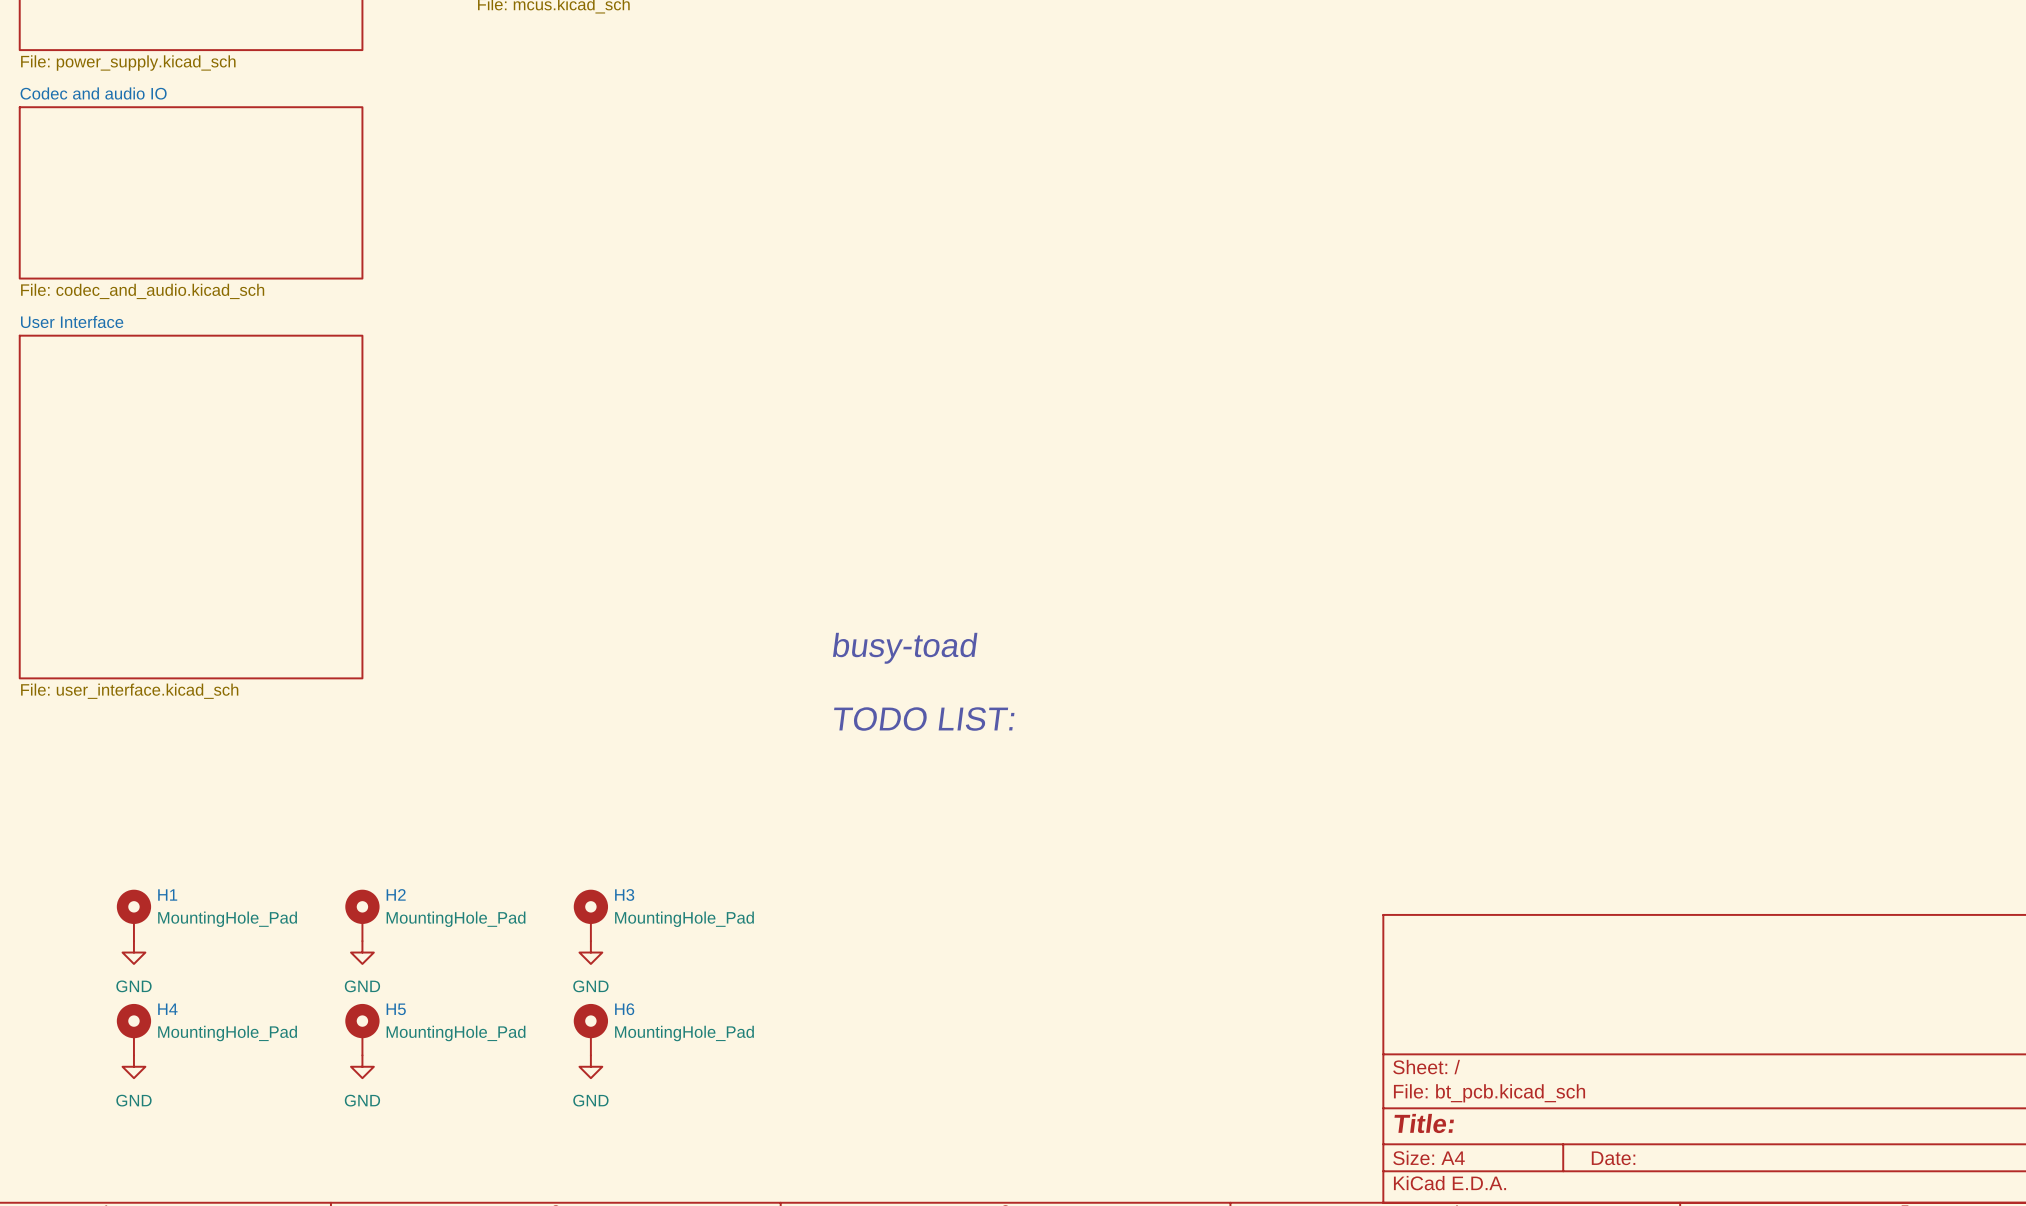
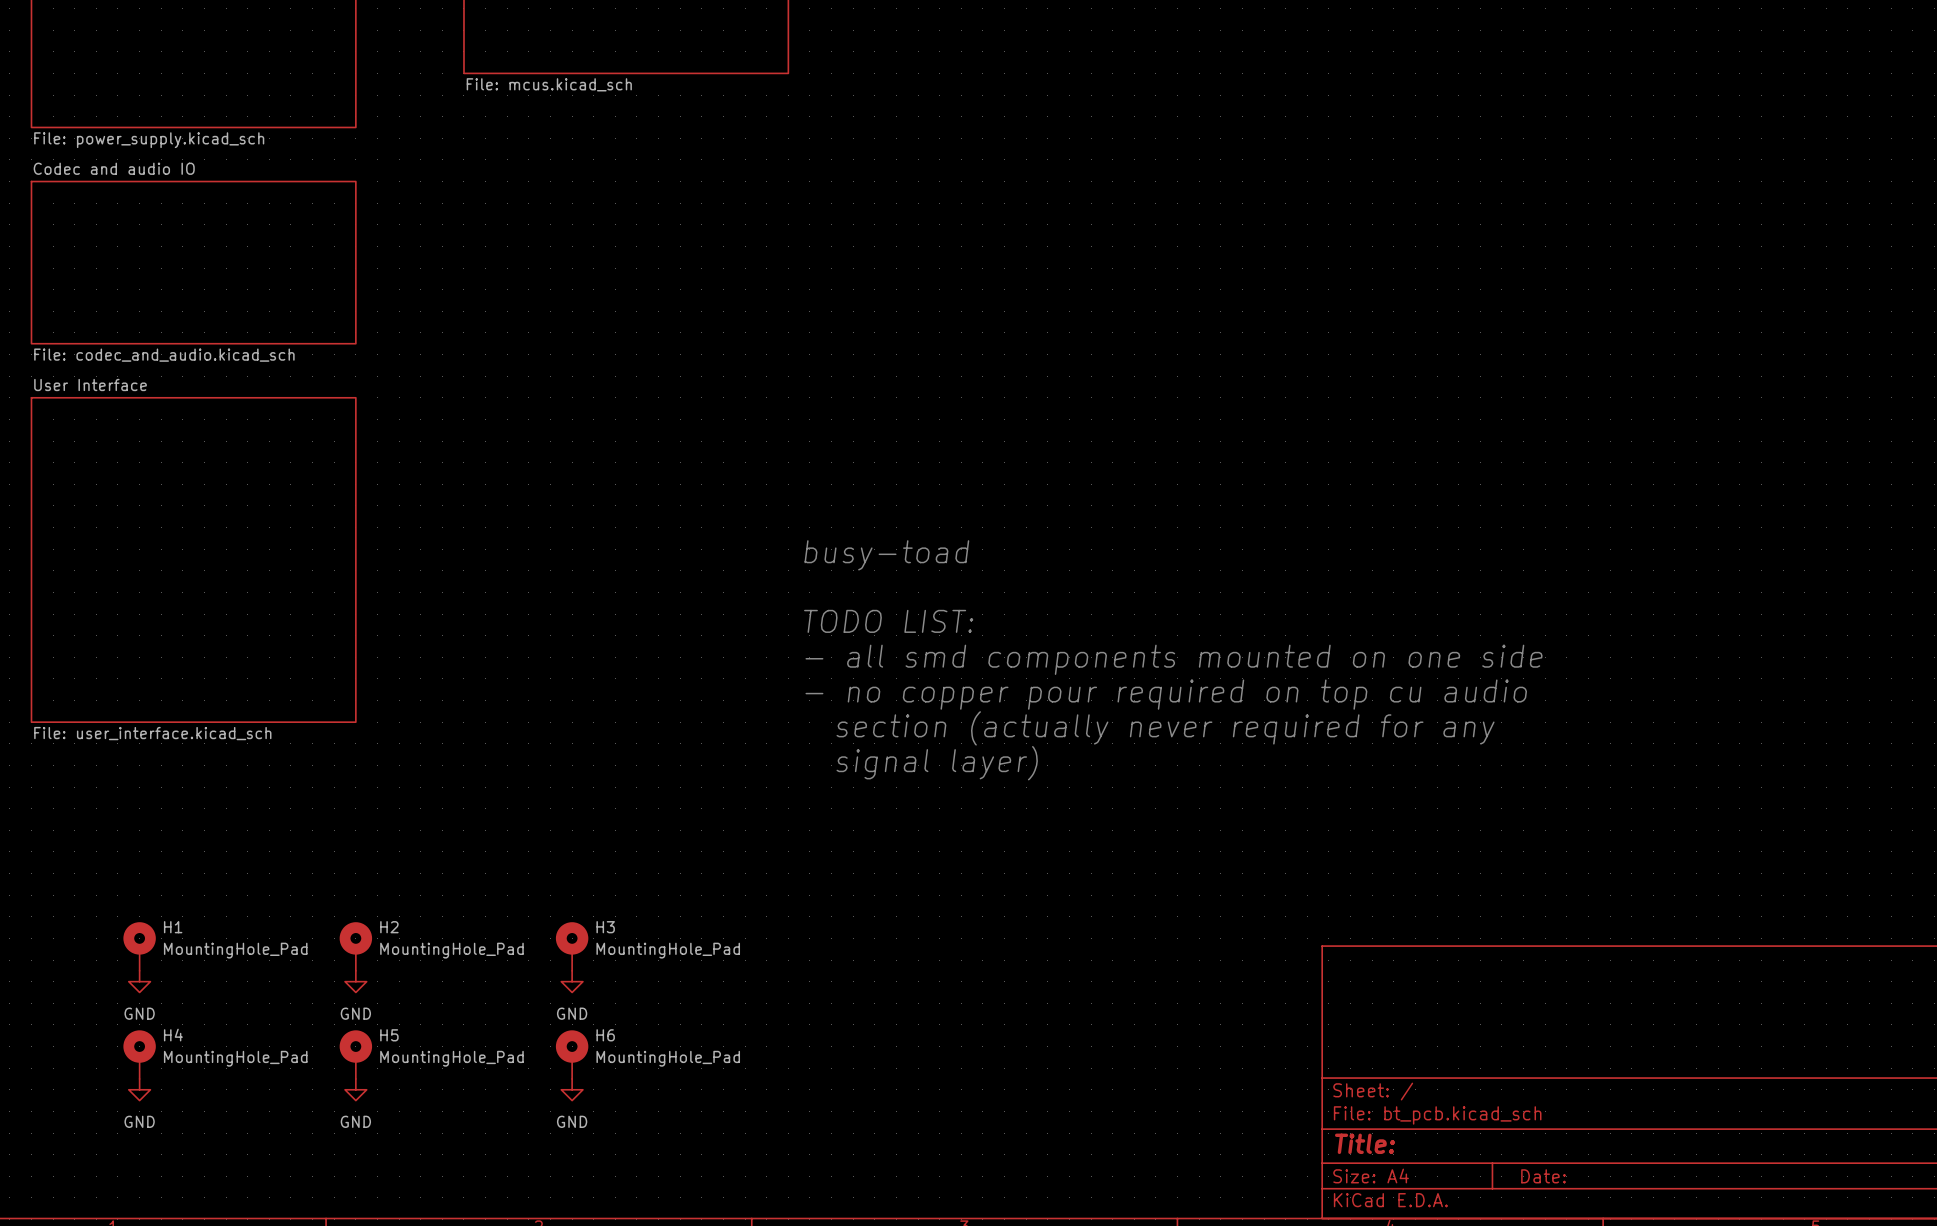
text: none -> busy-toad (886, 555)
text: none -> TODO LIST: (888, 621)
text: none -> - all smd components mounted on one side (1174, 659)
text: busy-toad (905, 648) -> - no copper pour required on top cu audio (1166, 694)
text: none -> section (actually never required for any (1165, 728)
text: TODO LIST: (924, 719) -> signal layer) (937, 763)

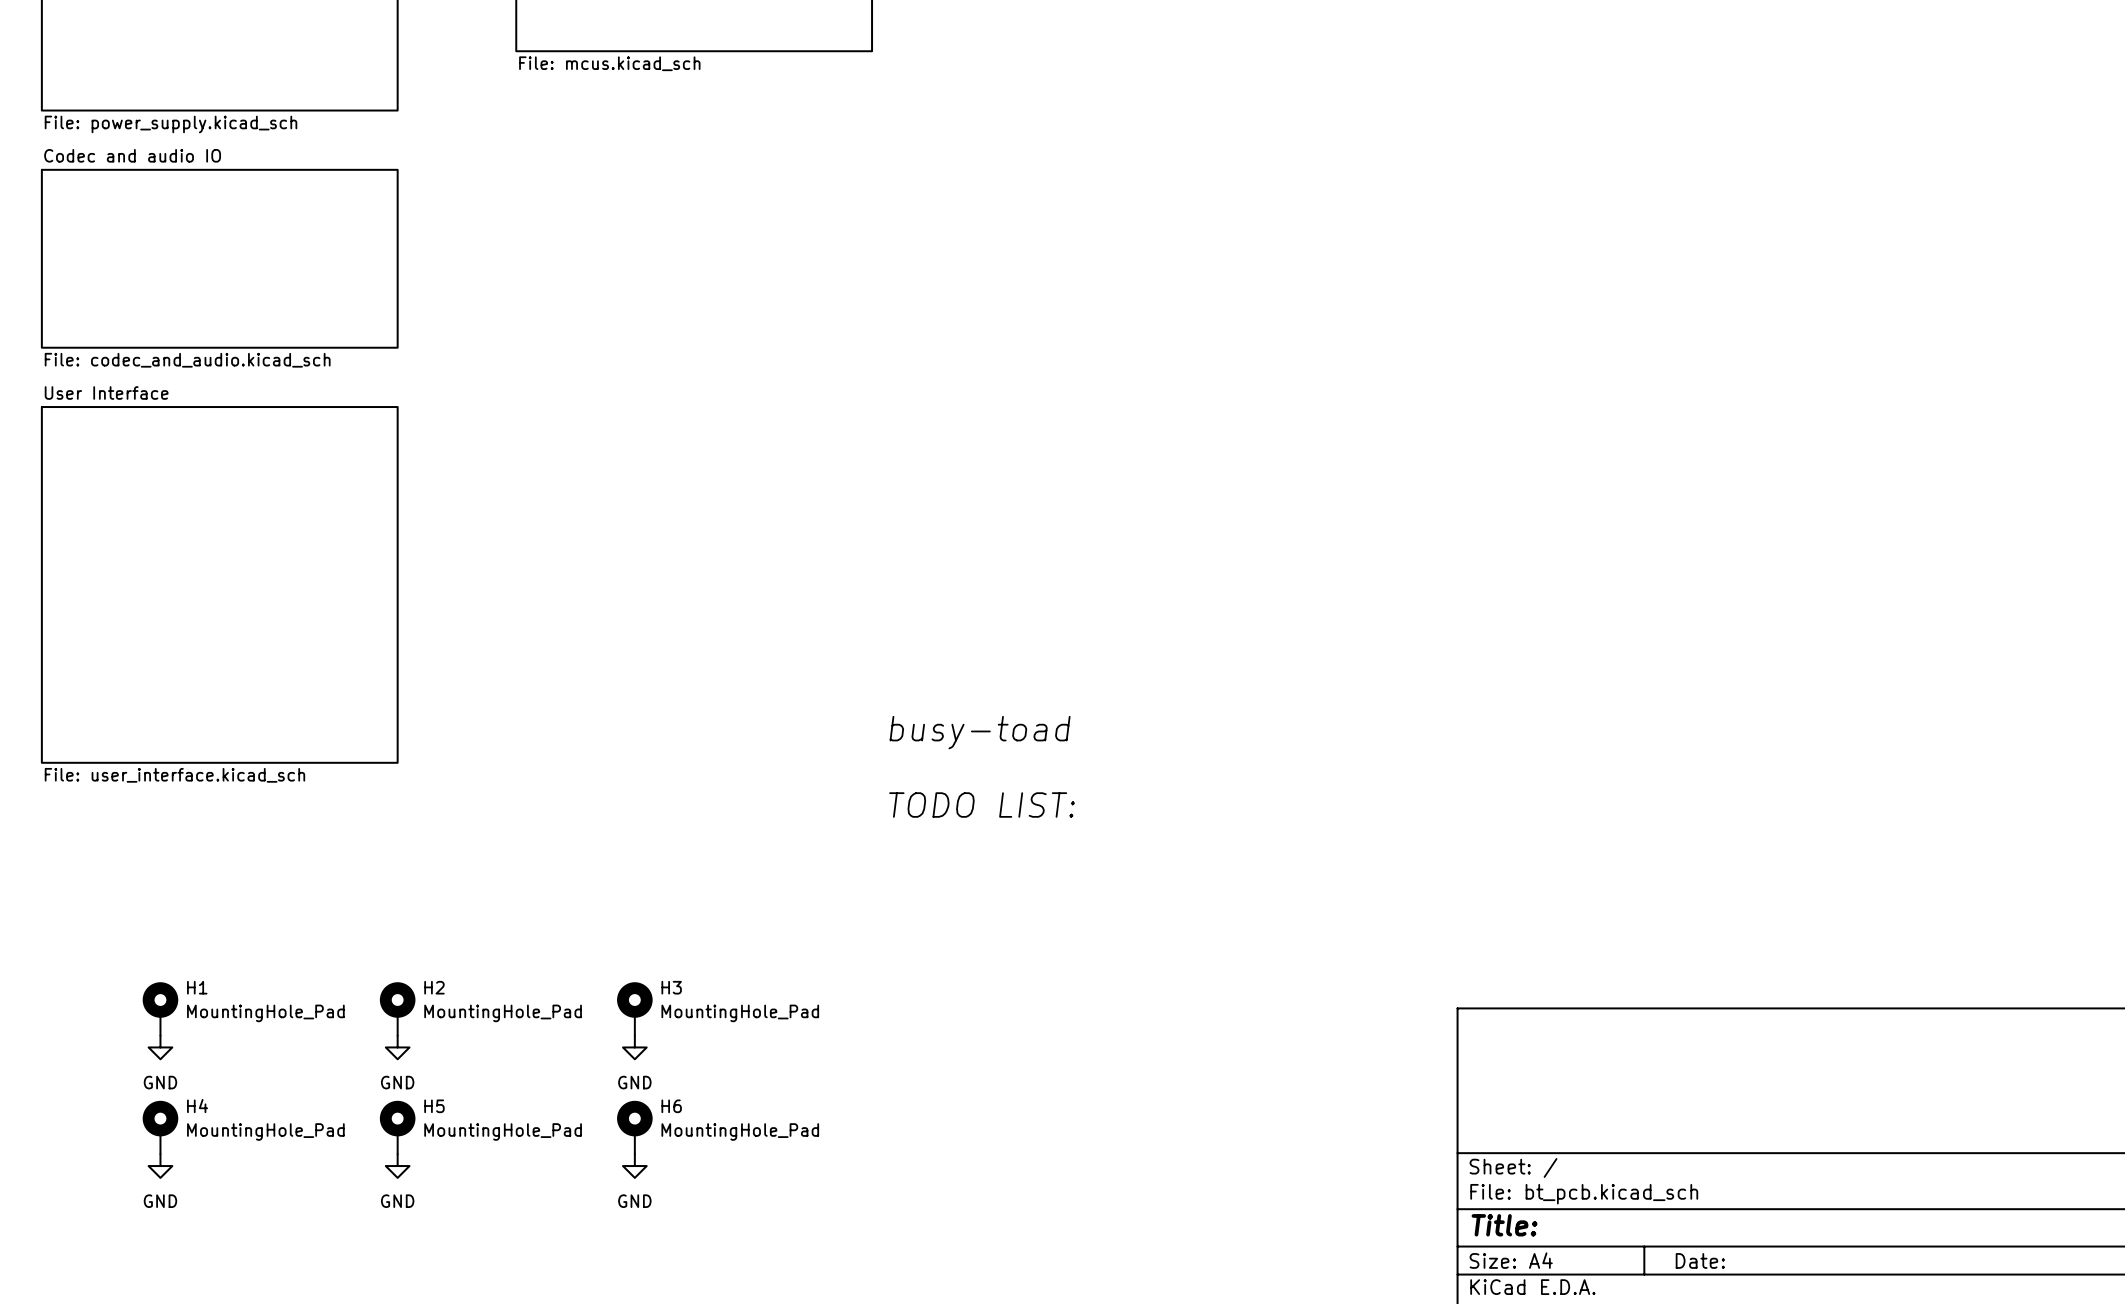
text: busy-toad (886, 555) -> none
text: TODO LIST: (888, 621) -> none
text: - all smd components mounted on one side (1174, 659) -> none
text: - no copper pour required on top cu audio (1166, 694) -> busy-toad (980, 732)
text: section (actually never required for any (1165, 728) -> none
text: signal layer) (937, 763) -> TODO LIST: (982, 805)

